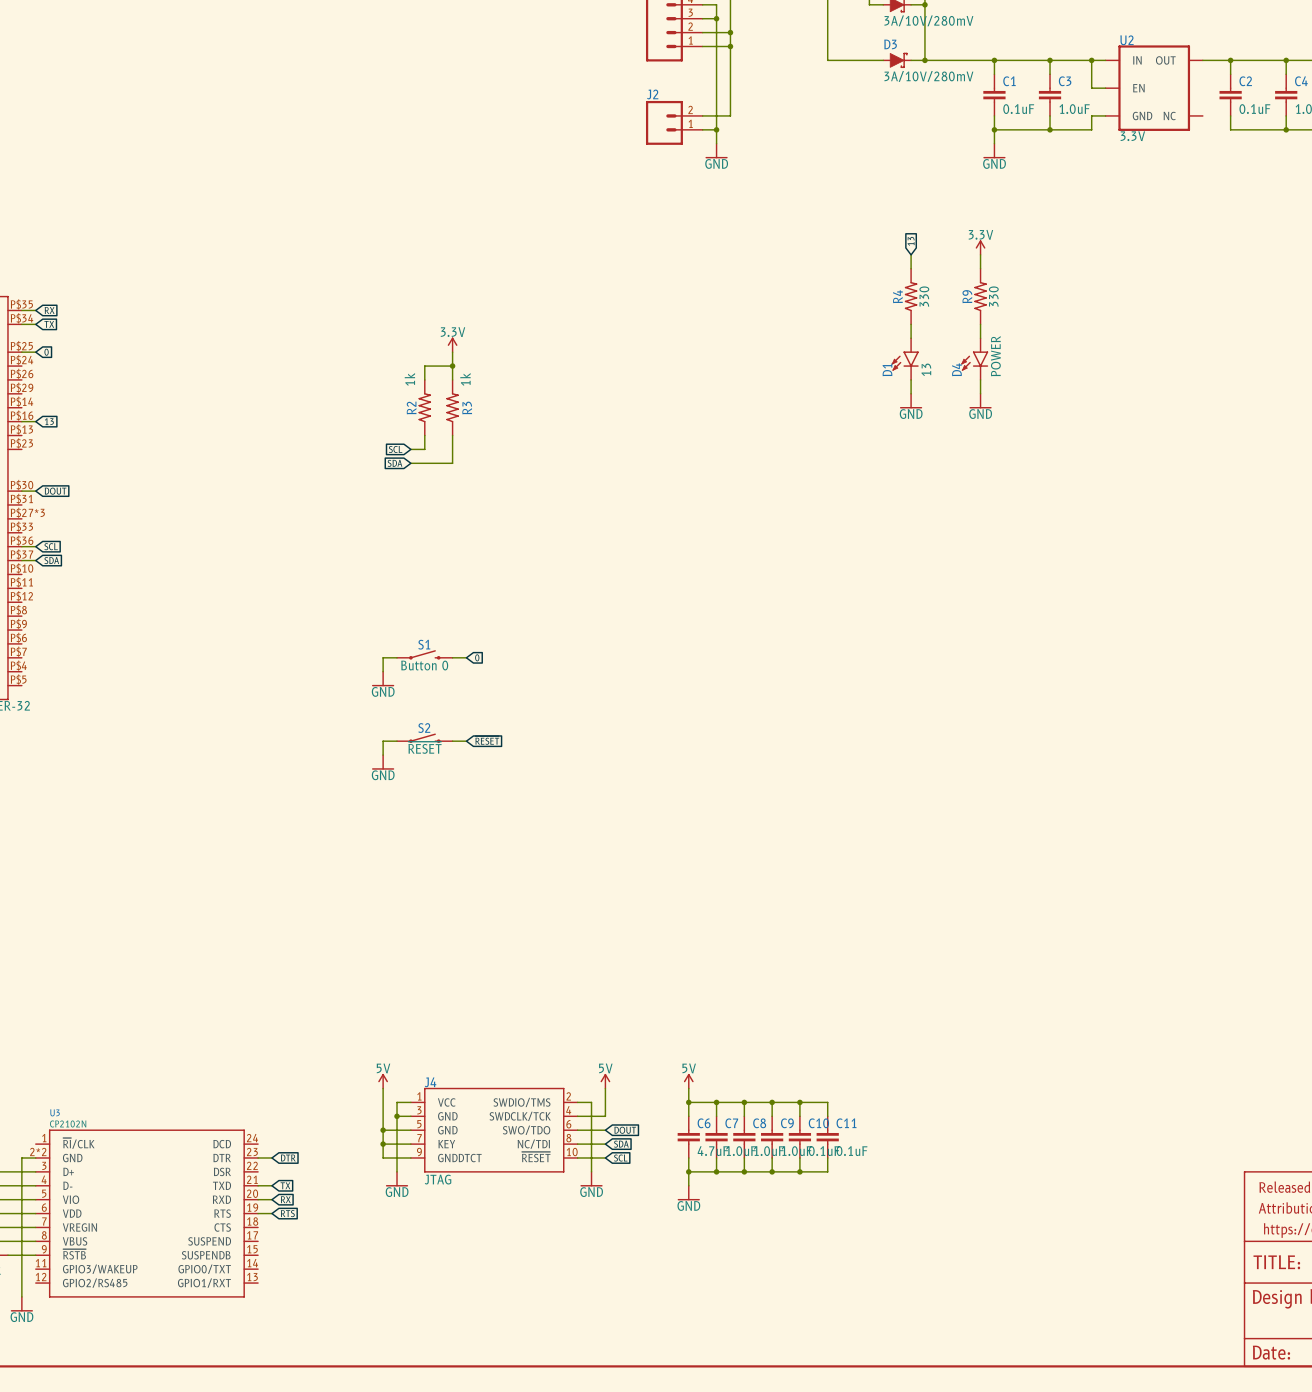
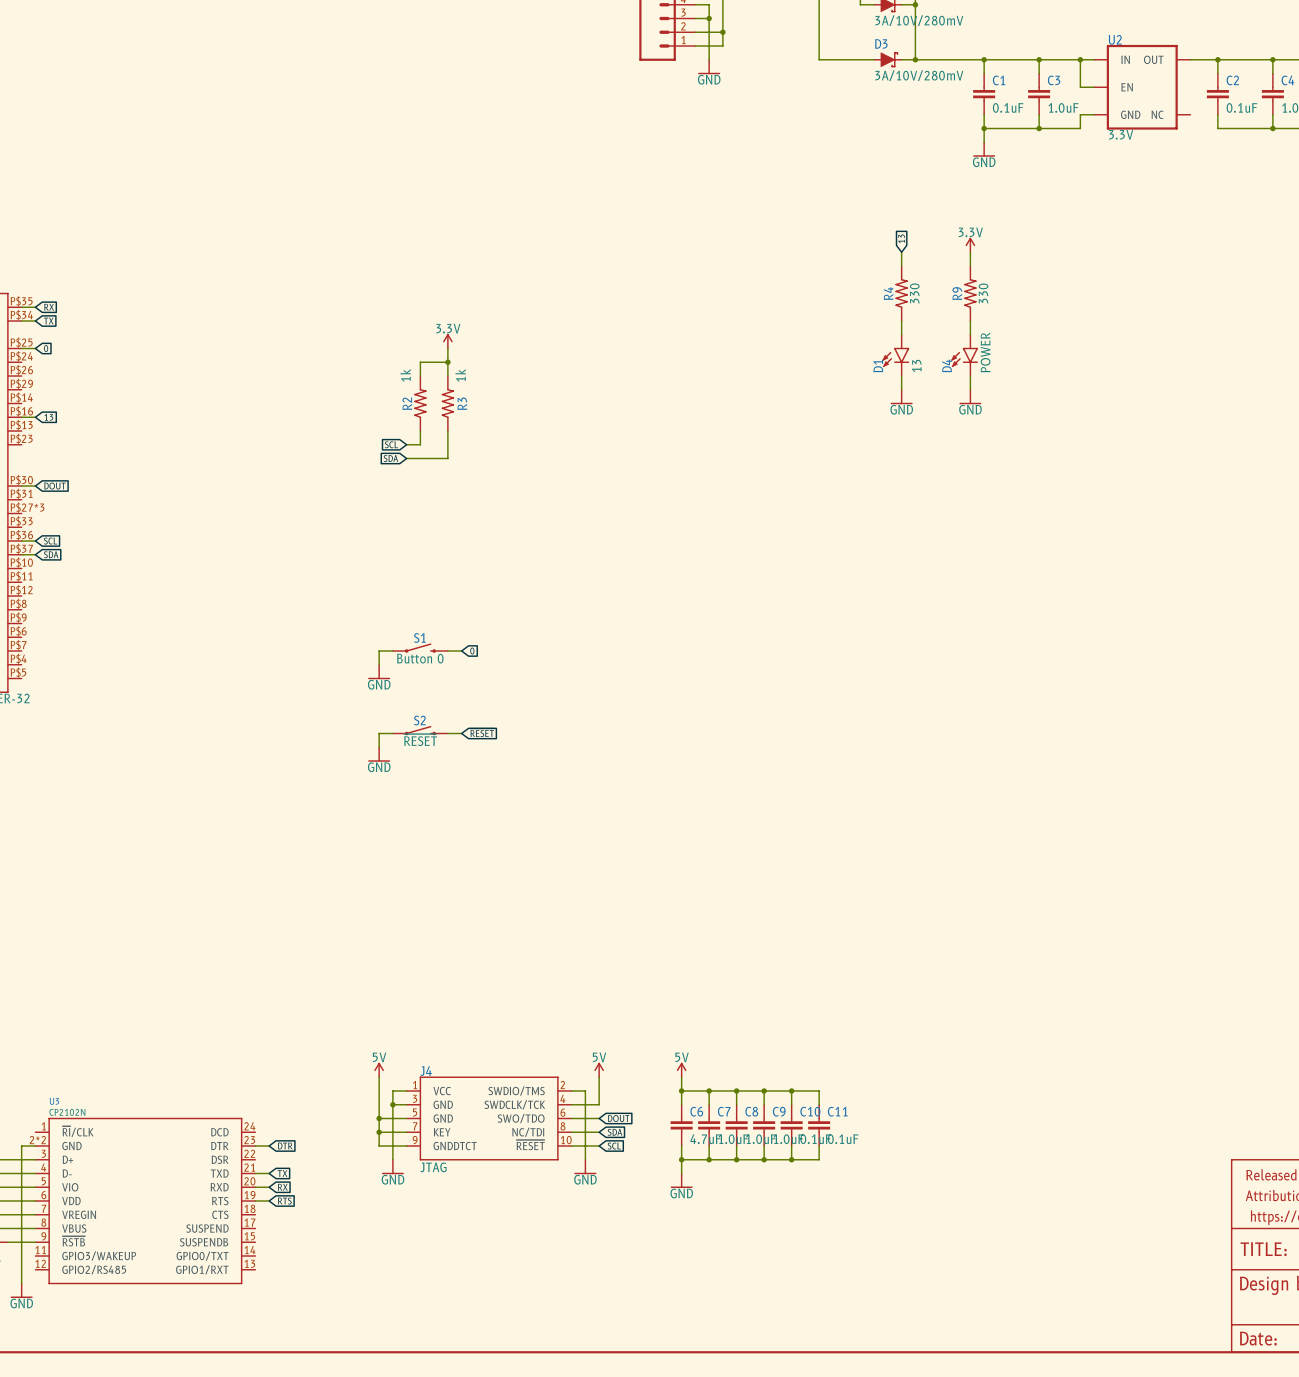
wire: (730, 46) (730, 115) (702, 115) -> none
junction: (730, 46) -> none
wire: (716, 60) (716, 143) -> none
J2: (674, 122) -> none
wire: (702, 129) (716, 129) -> none
junction: (716, 129) -> none
power symbol position: GND (716, 151) -> GND (709, 66)

